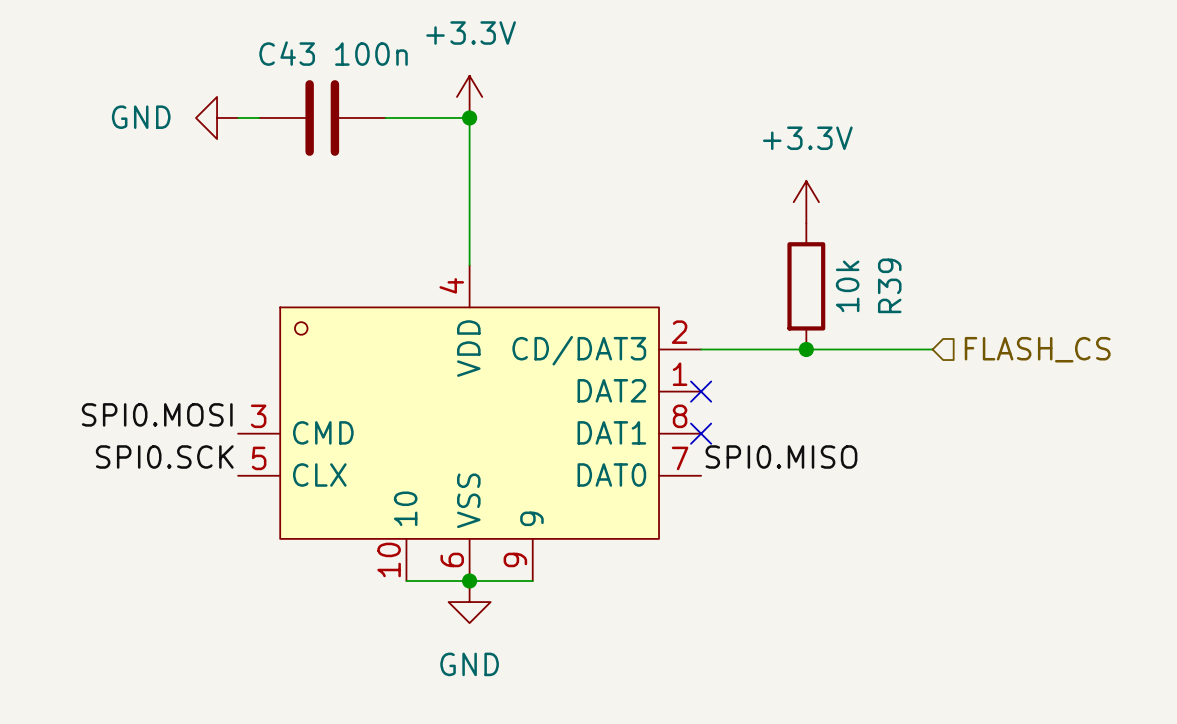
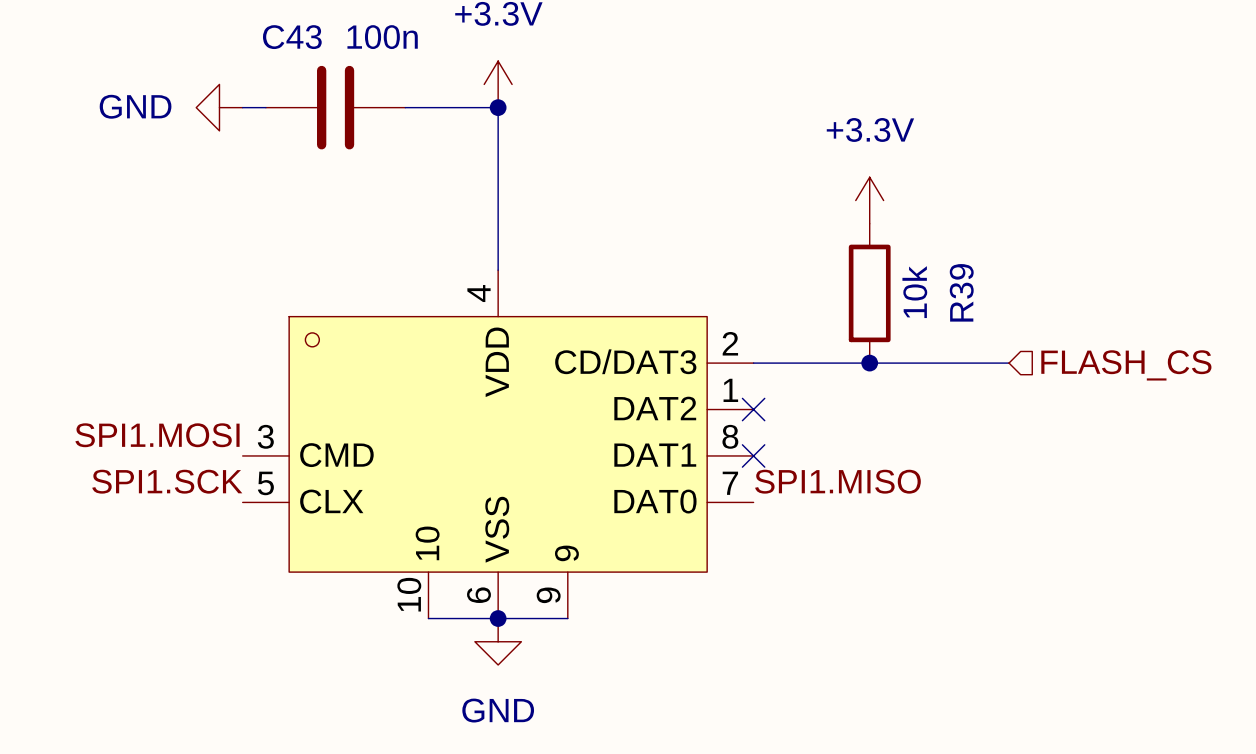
label: SPI0.MOSI (157, 414) -> SPI1.MOSI (157, 435)
label: SPI0.SCK (164, 456) -> SPI1.SCK (167, 481)
label: SPI0.MISO (781, 456) -> SPI1.MISO (837, 481)

